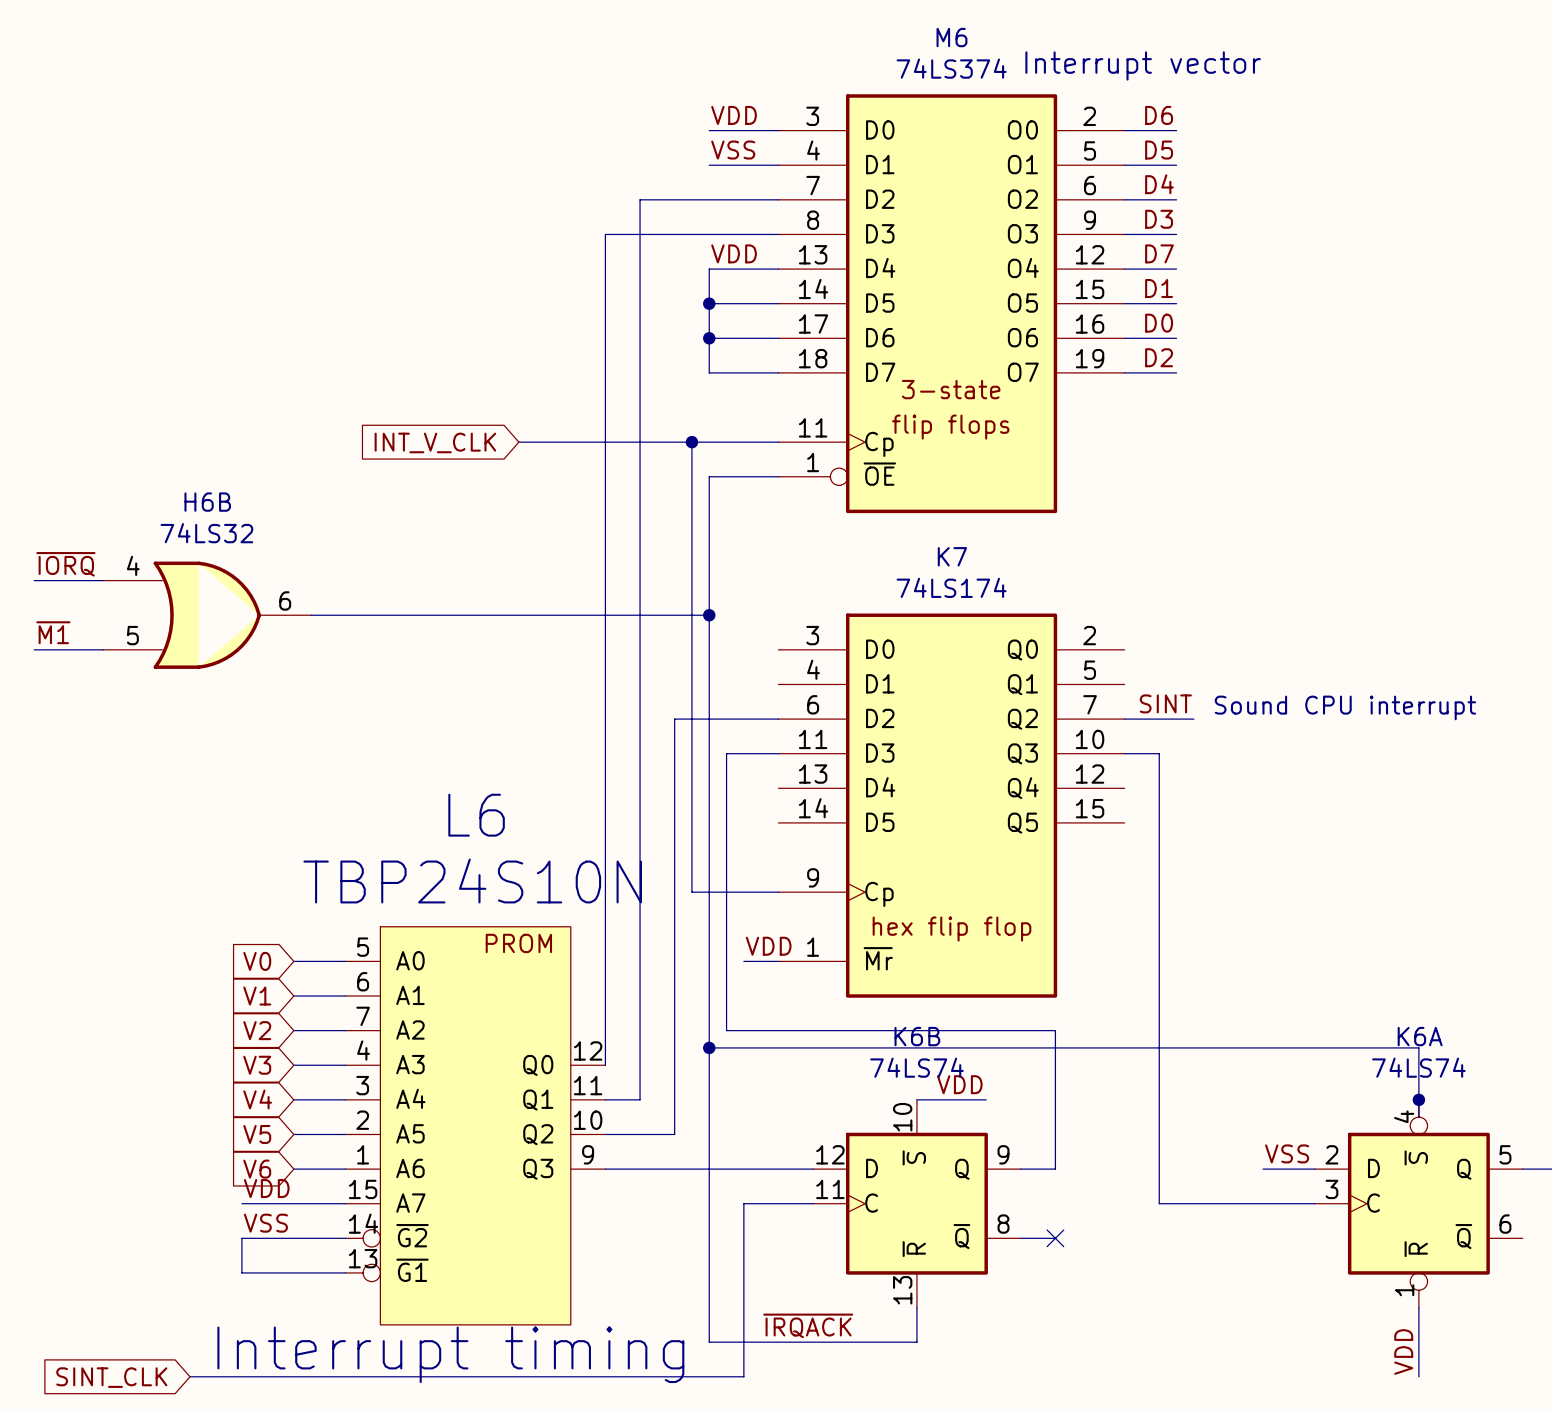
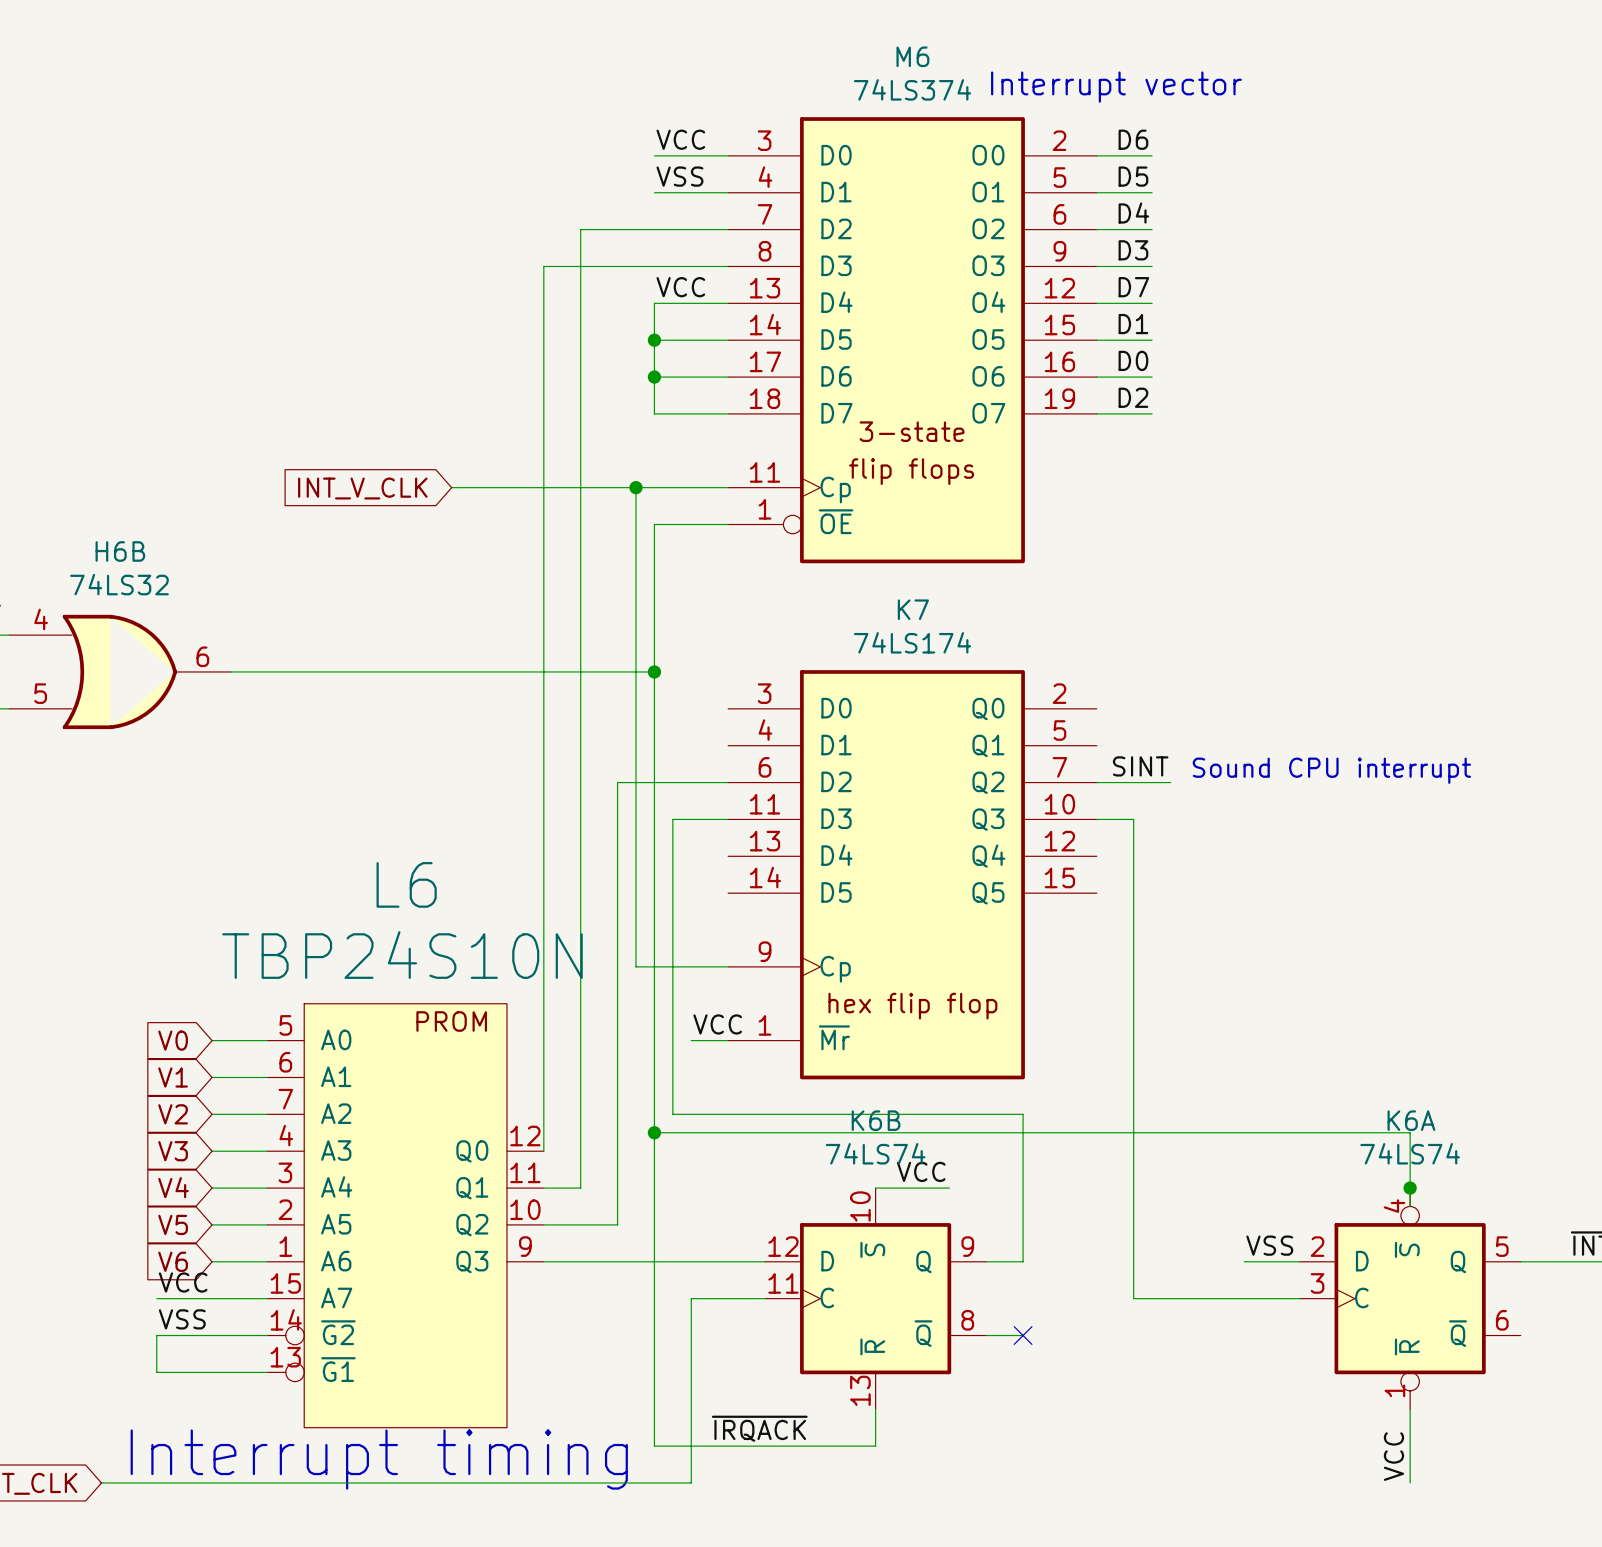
label: VDD (734, 115) -> VCC (680, 139)
label: VDD (734, 253) -> VCC (680, 287)
label: VDD (768, 946) -> VCC (717, 1024)
label: VDD (959, 1084) -> VCC (921, 1171)
label: VDD (266, 1188) -> VCC (183, 1282)
label: VDD (1403, 1352) -> VCC (1393, 1456)

